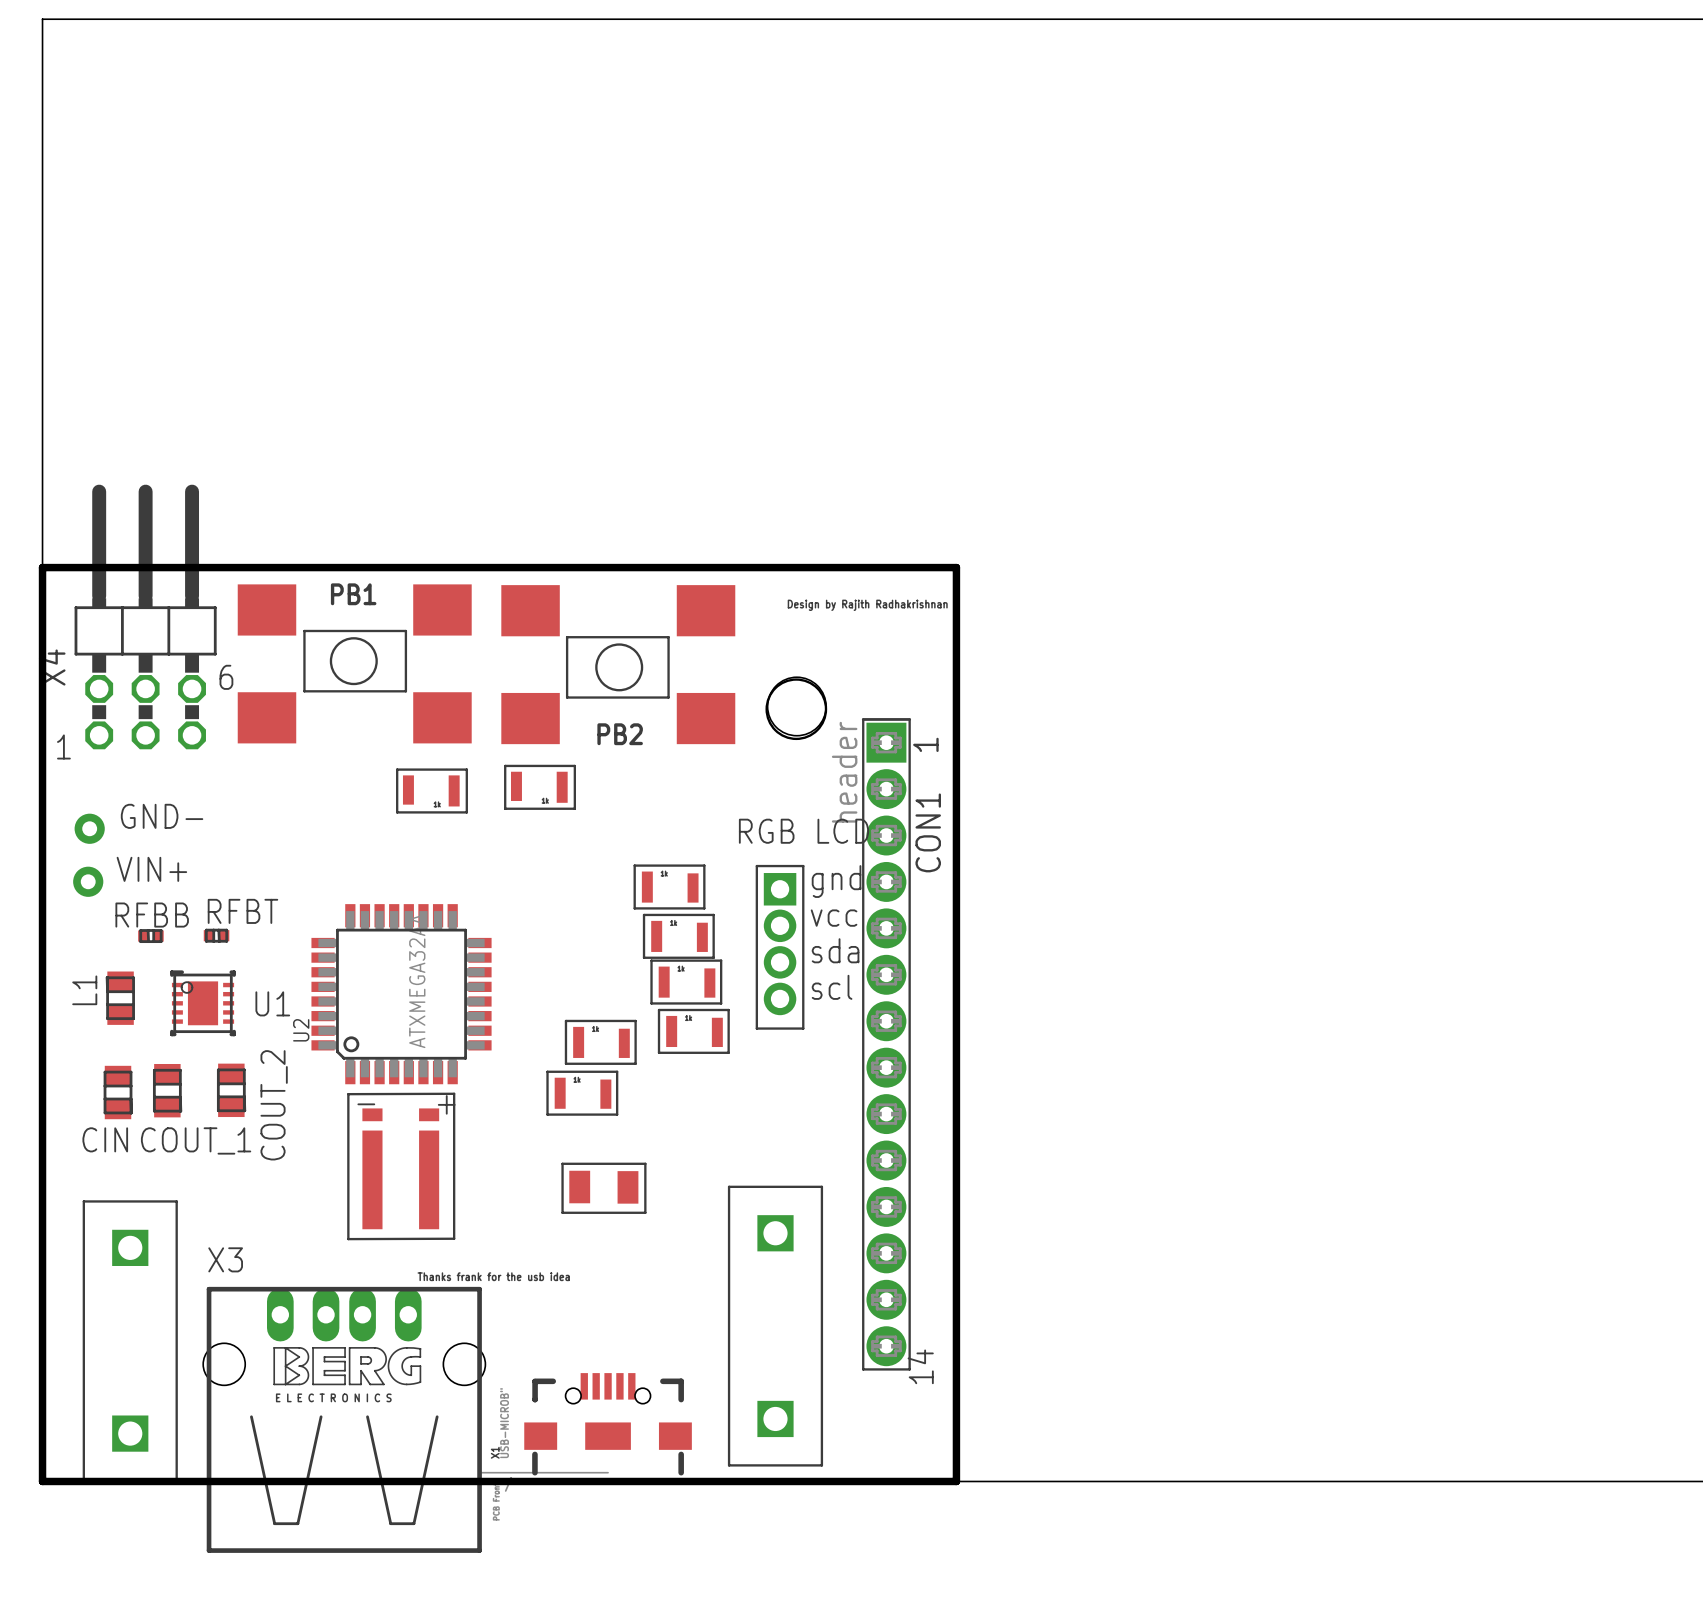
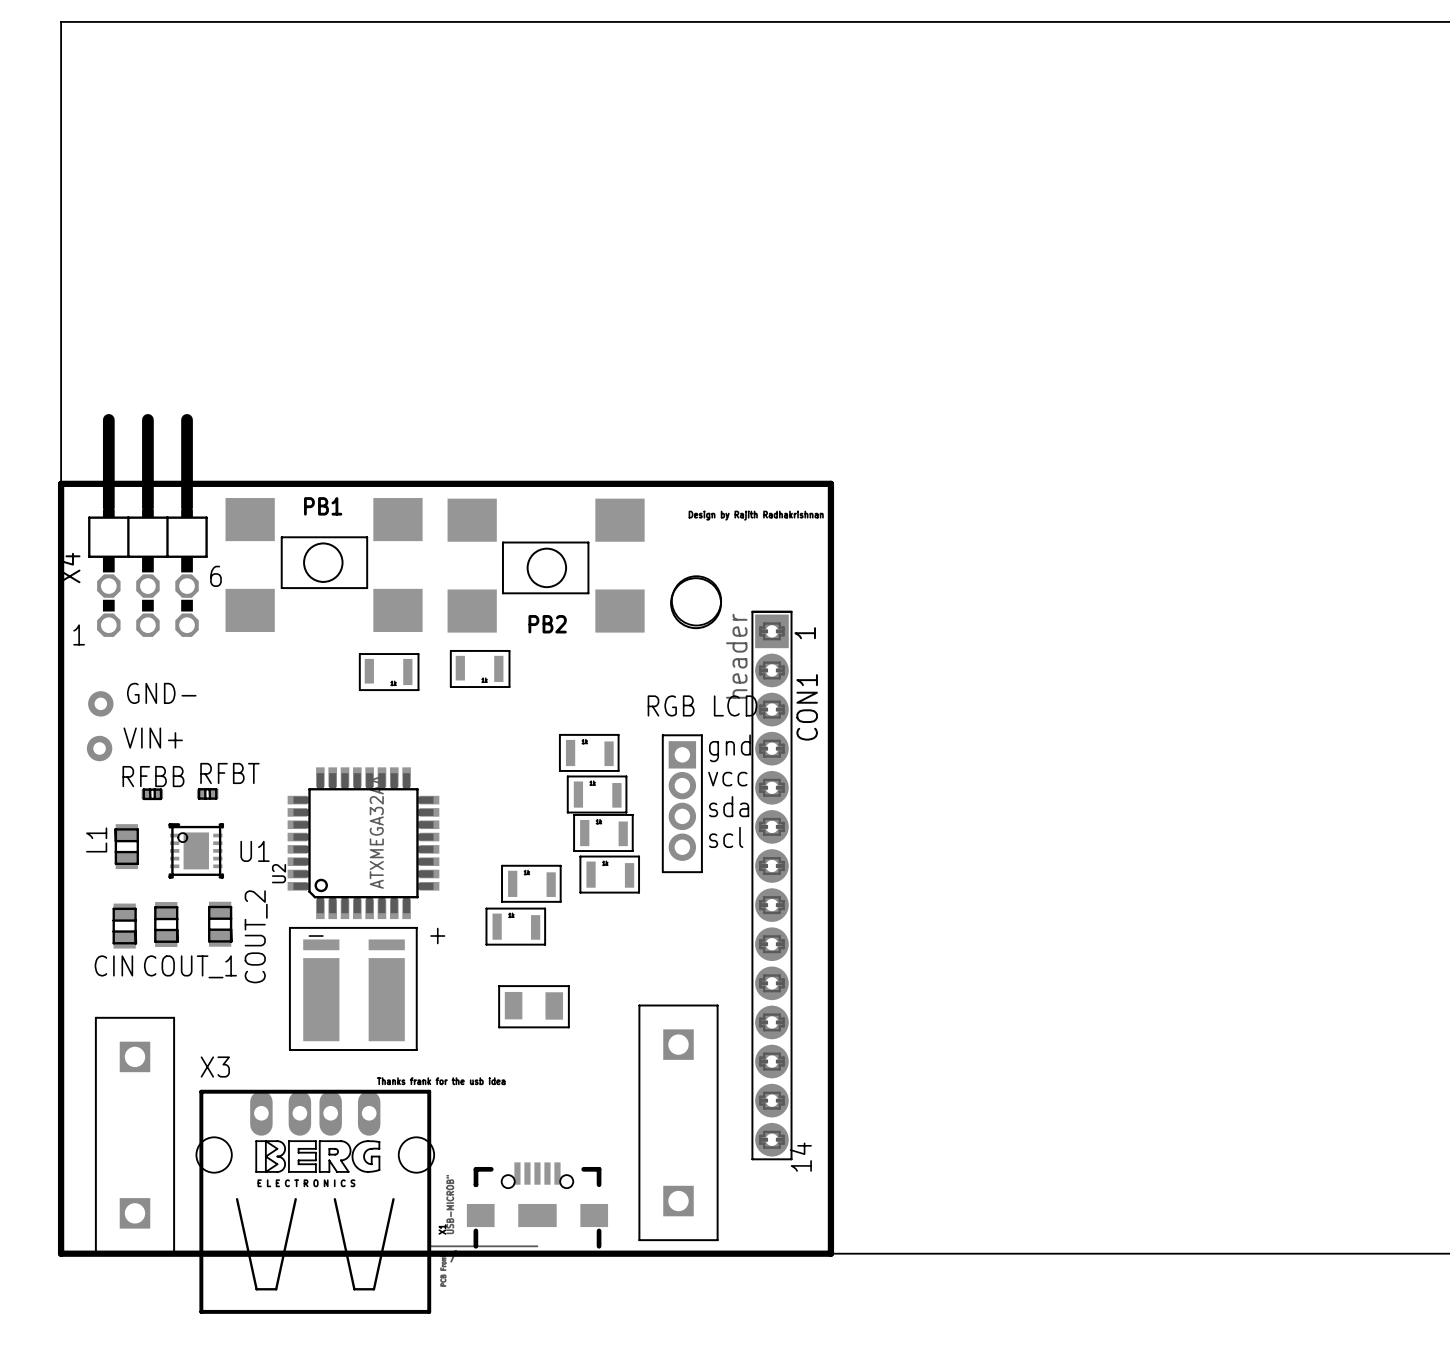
part footprint: [347, 1092, 456, 1241] -> [288, 926, 418, 1051]

